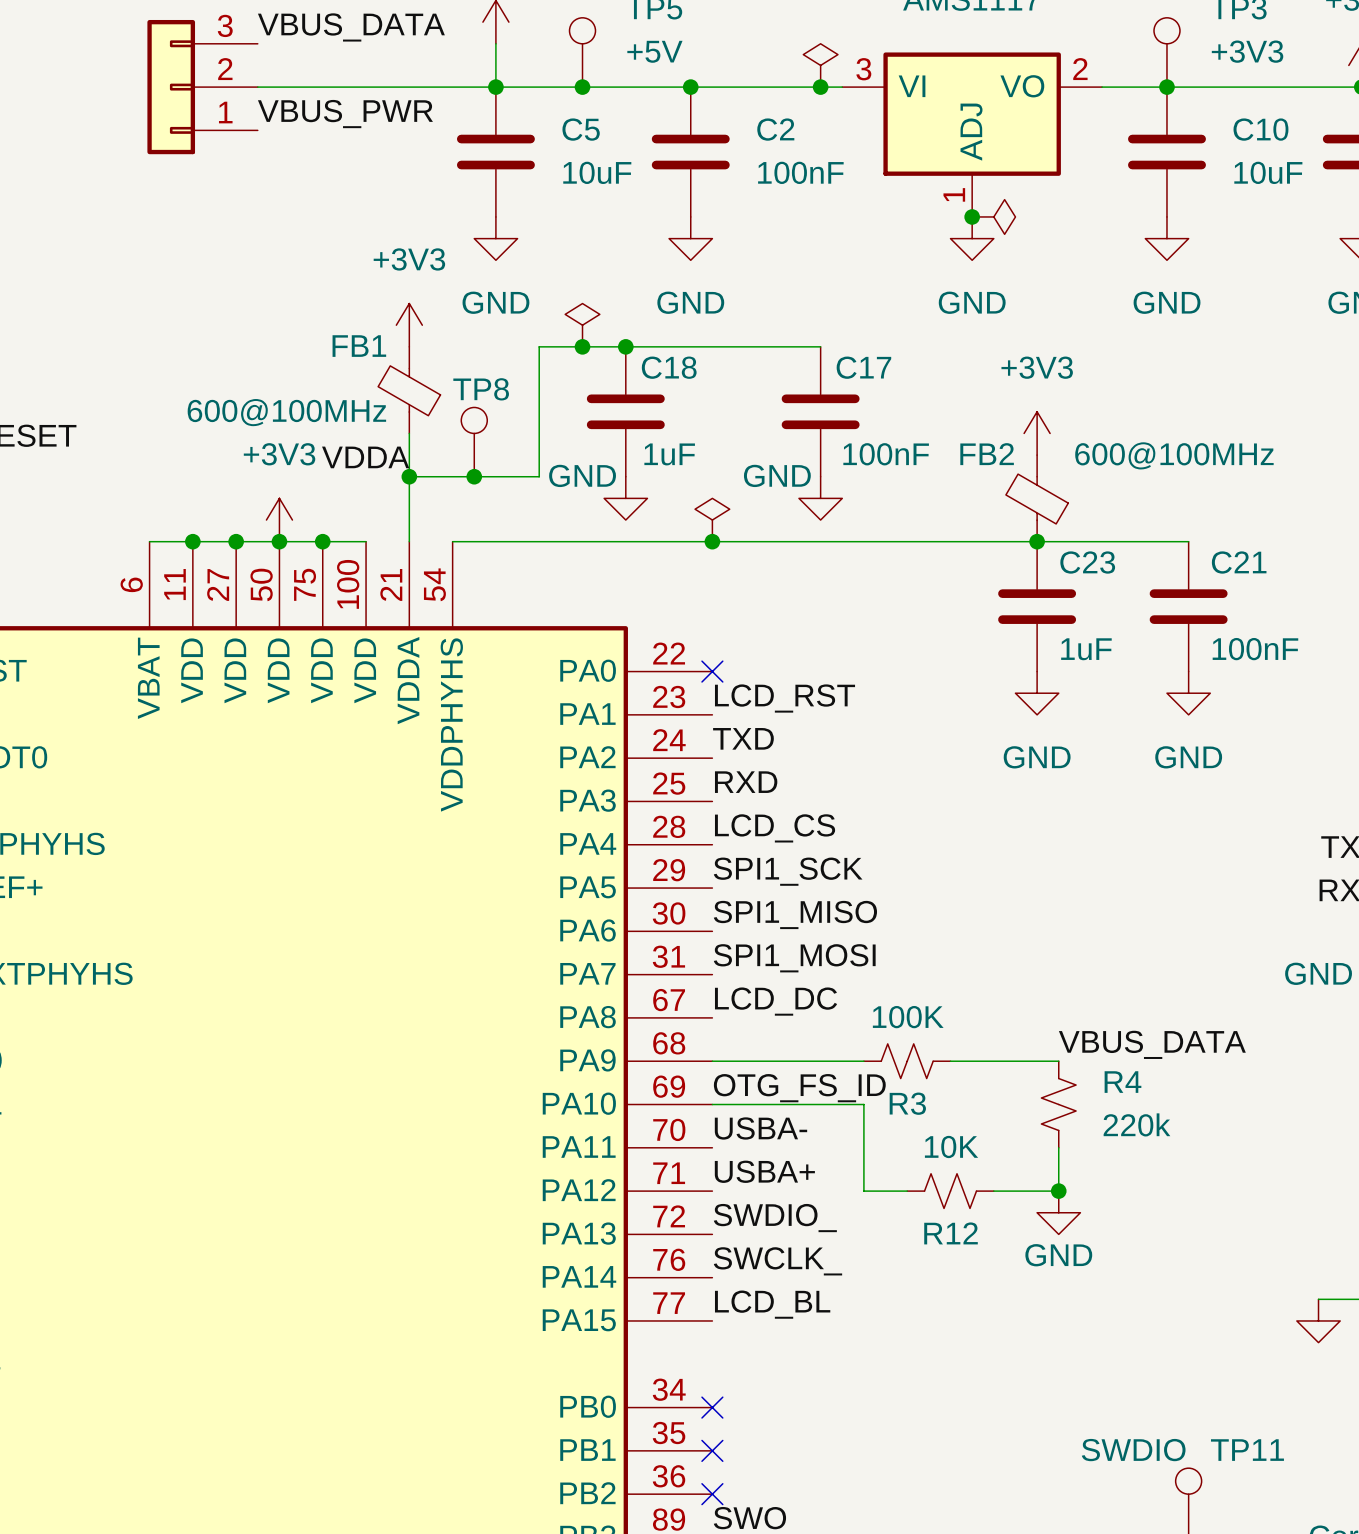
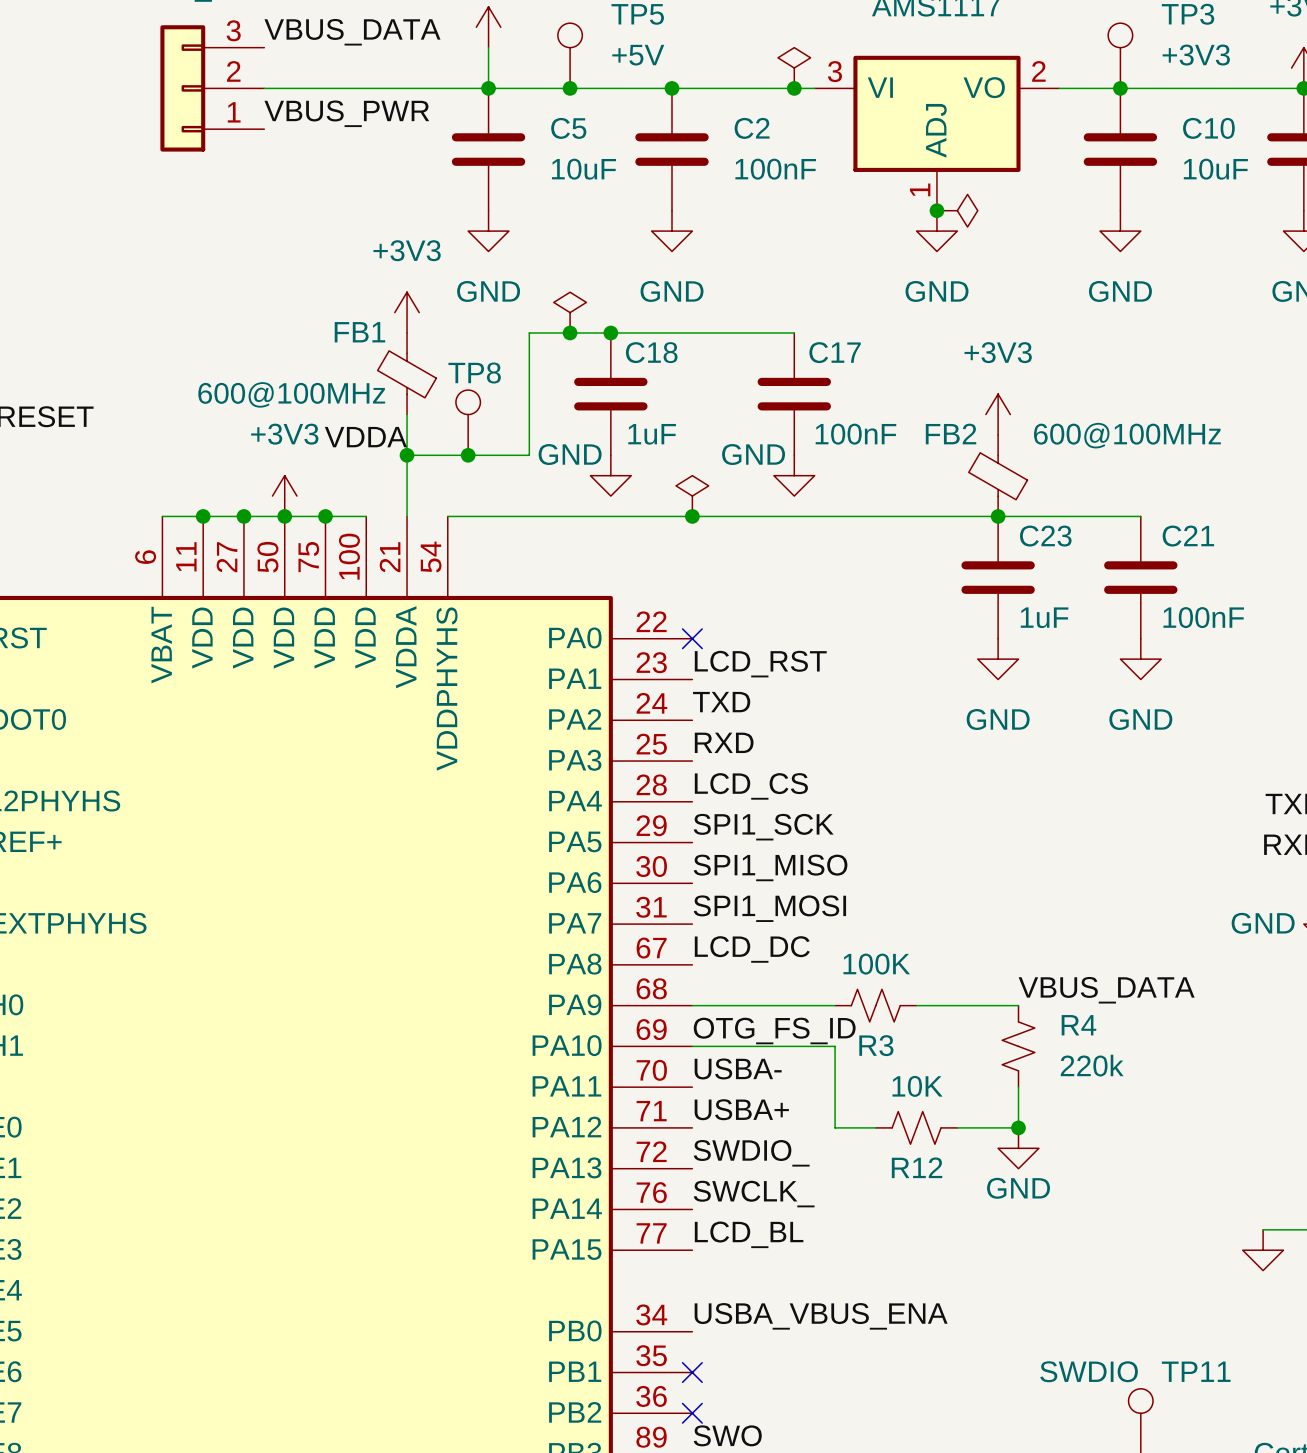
label: none -> USBA_VBUS_ENA (821, 1316)
no-connect mark: (712, 1407) -> none

